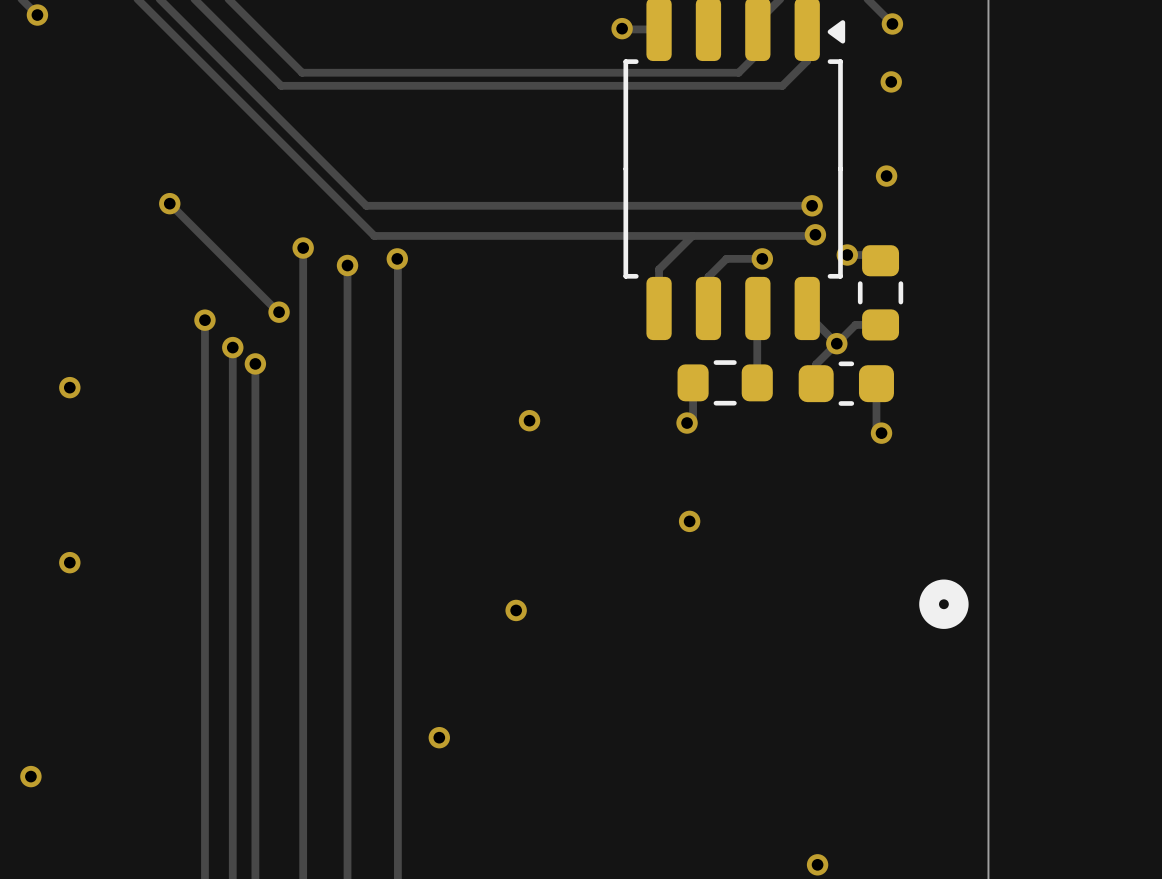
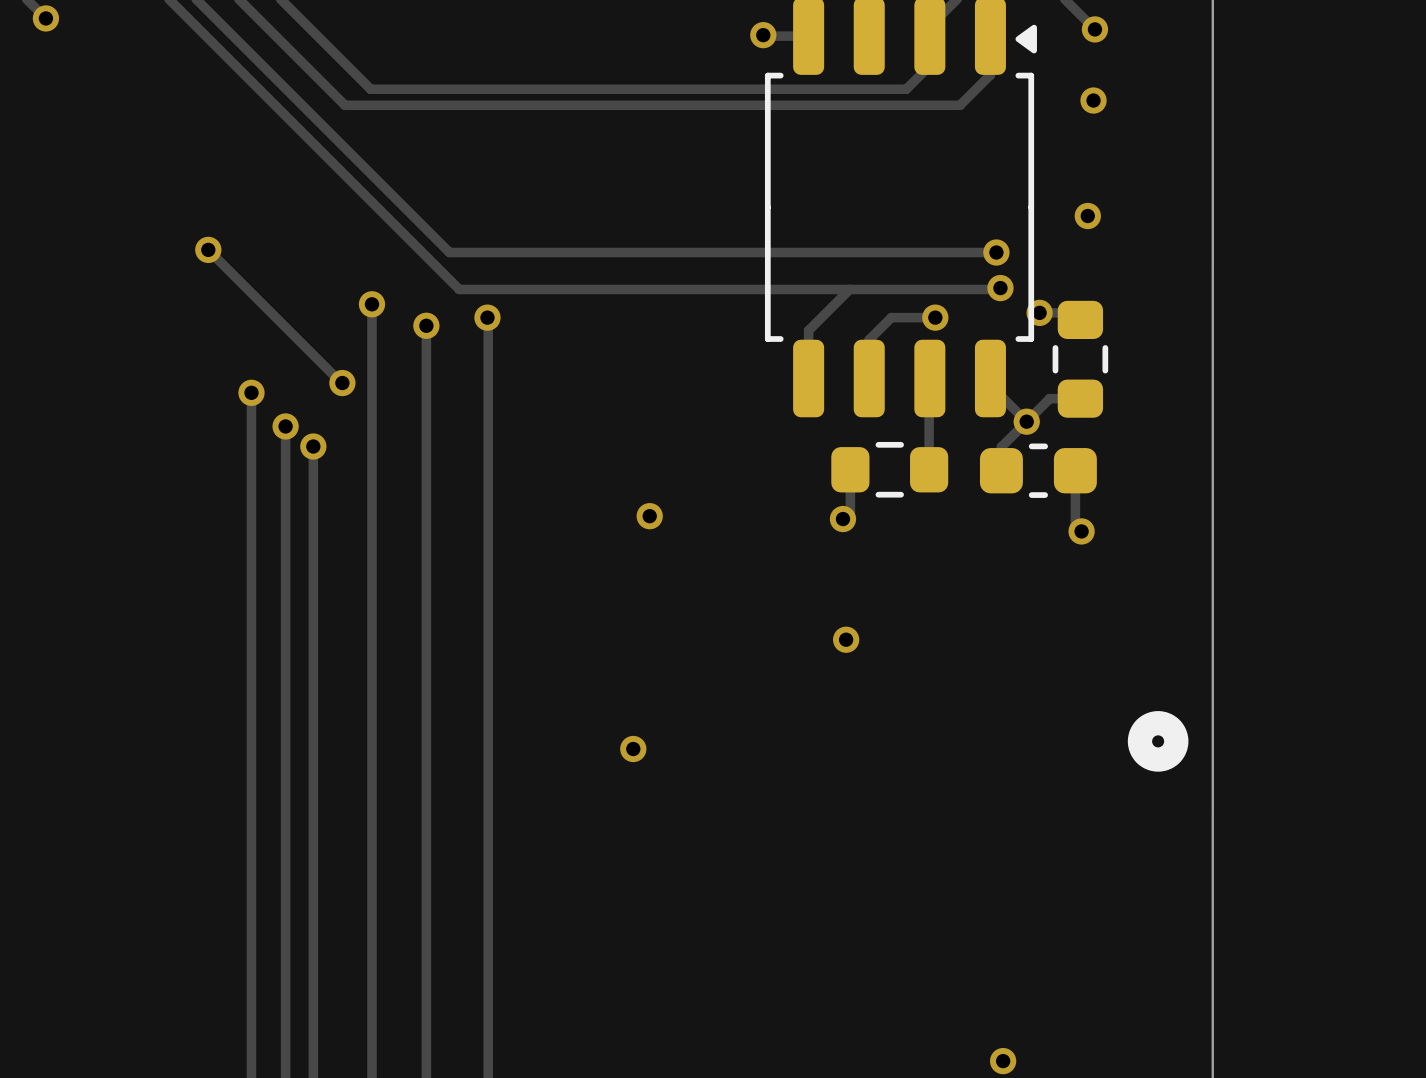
via: (69, 387) -> none
via: (69, 562) -> none
via: (439, 737) -> none
via: (30, 776) -> none

